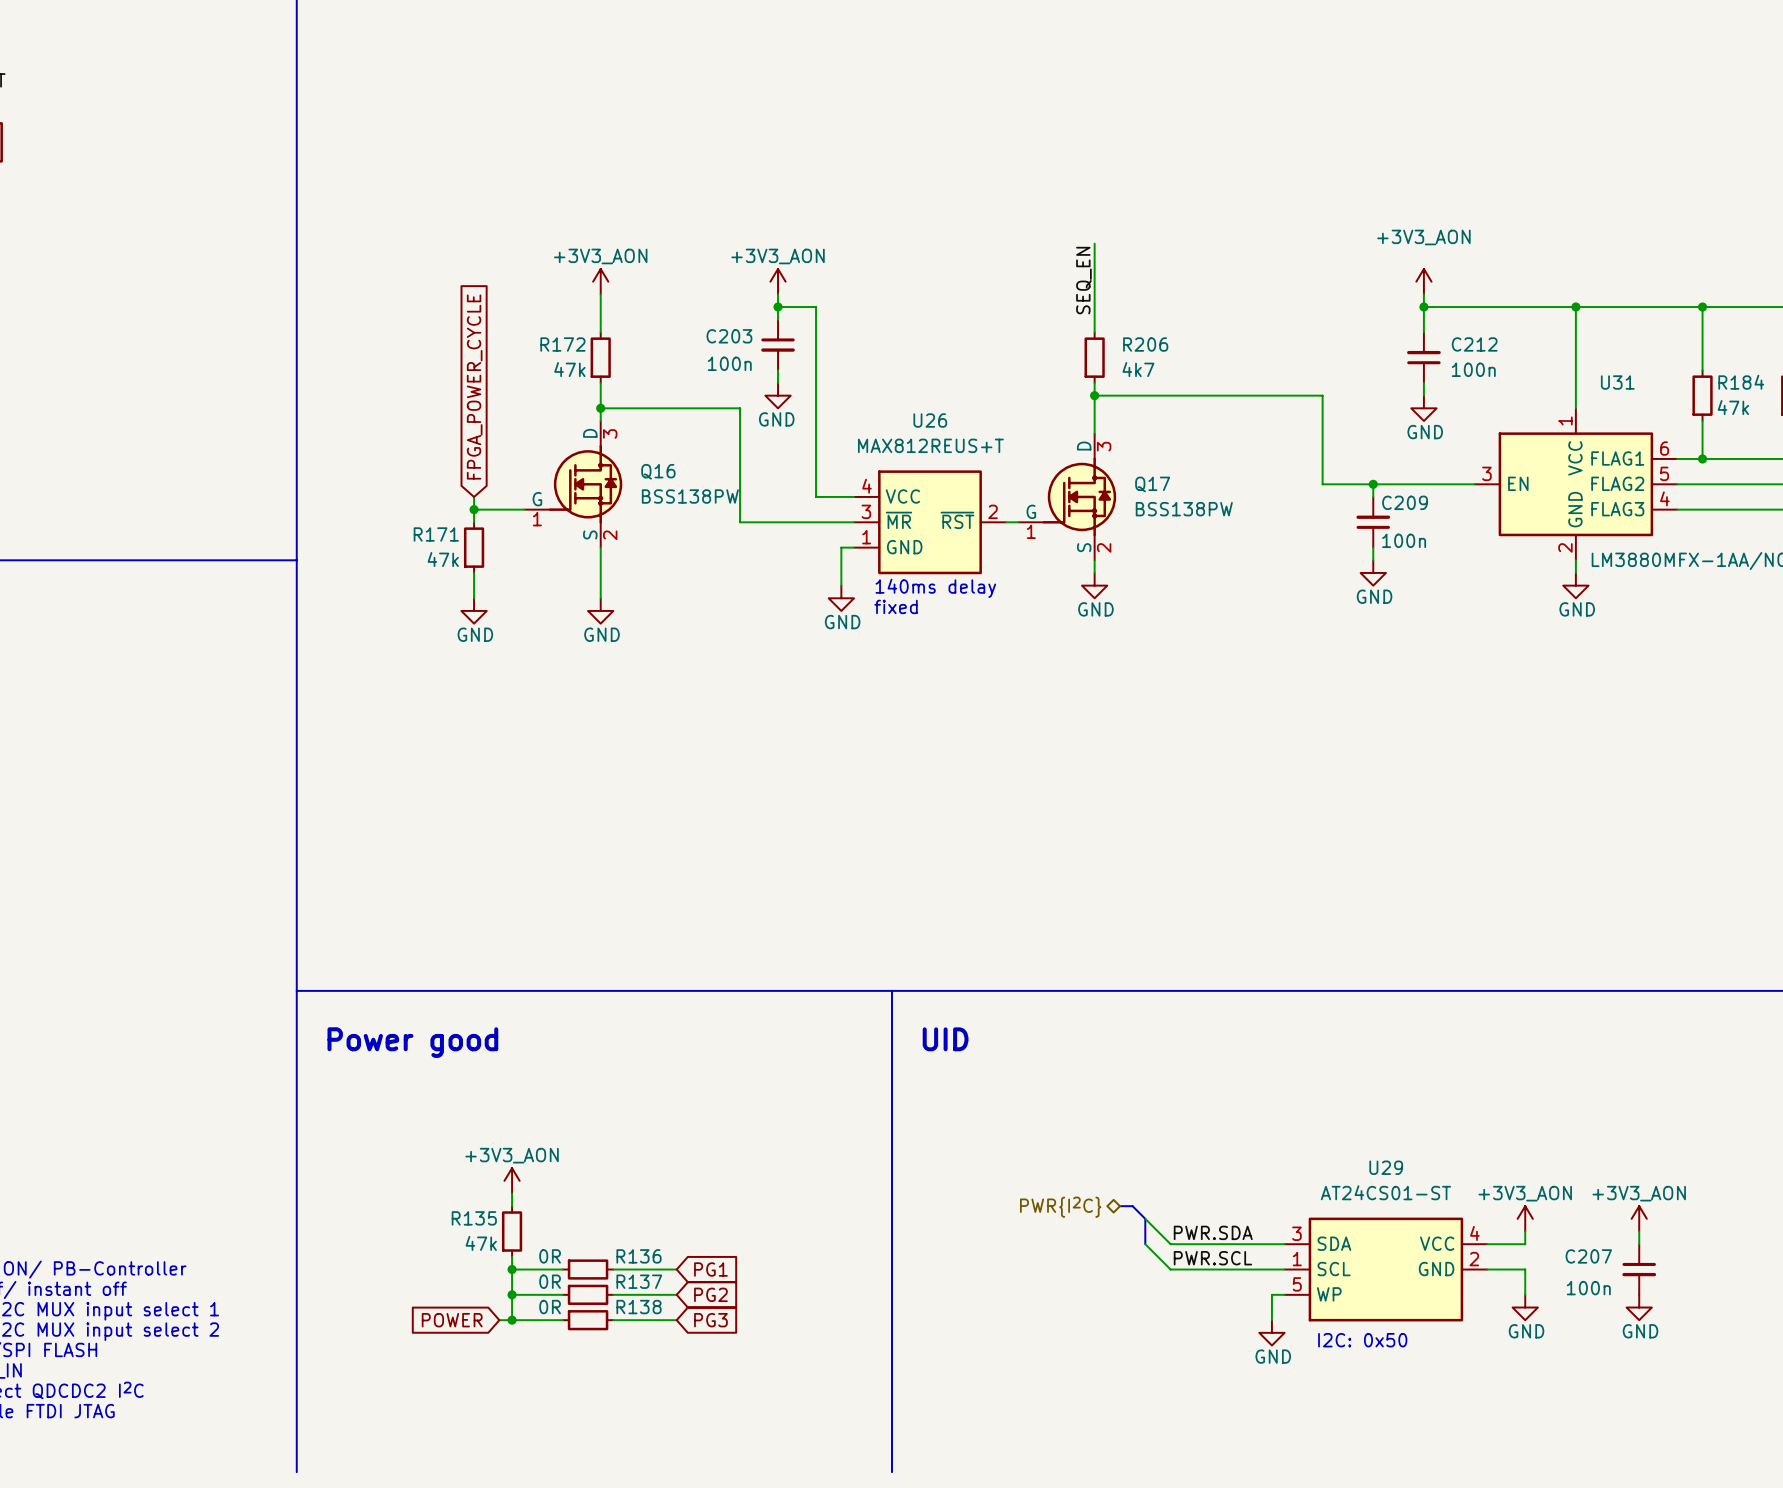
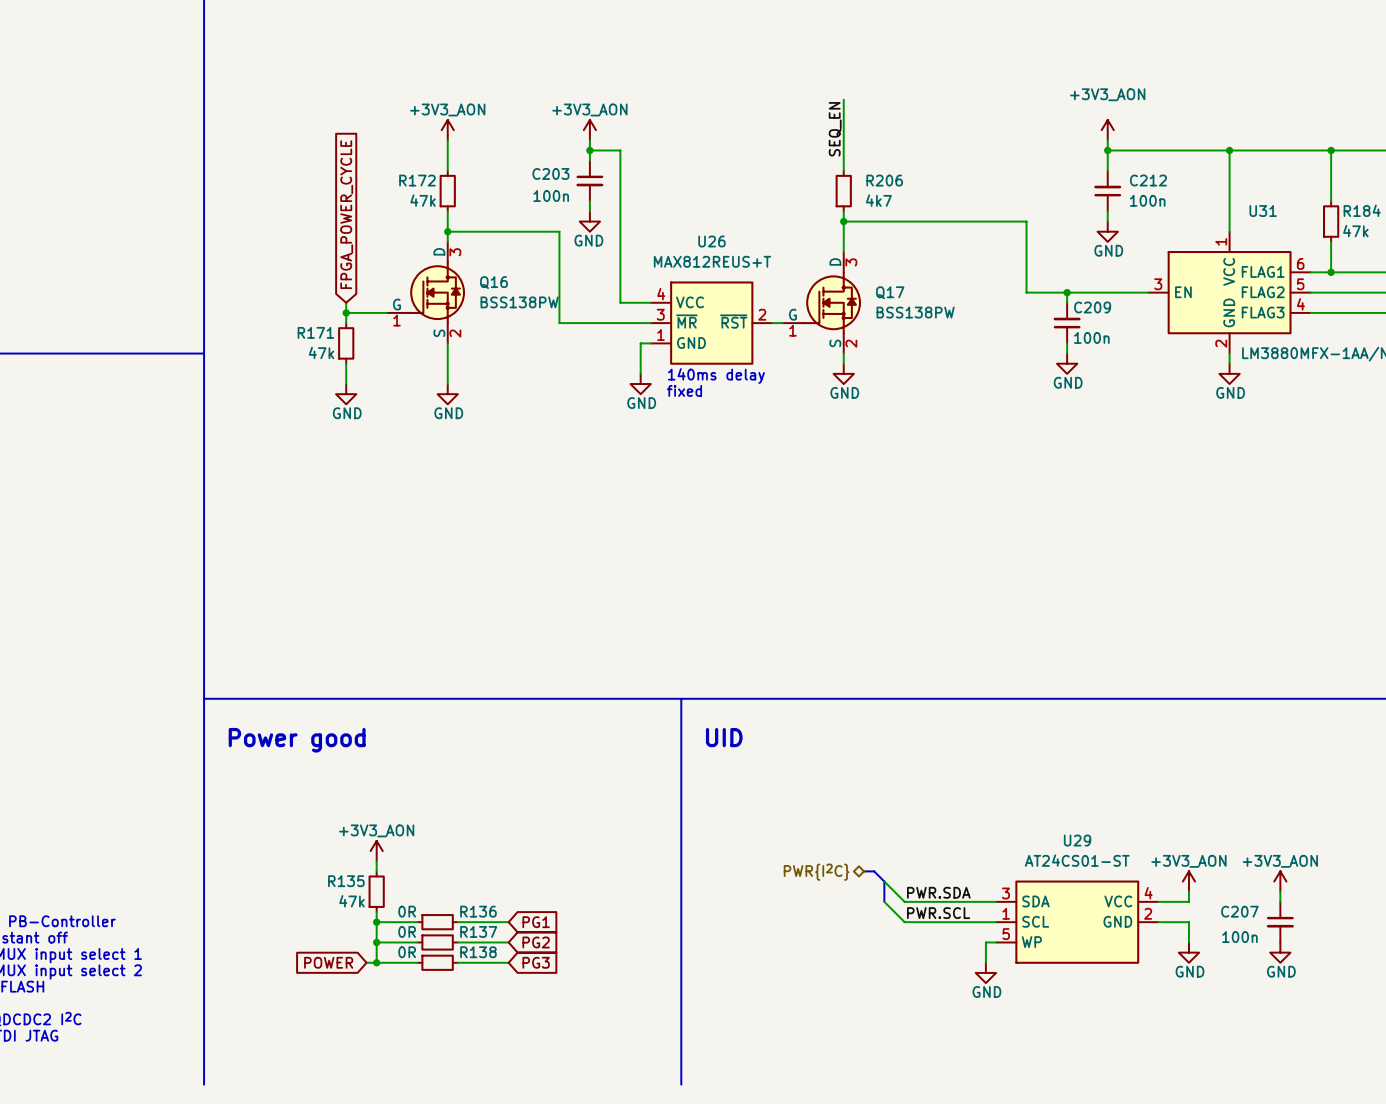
text: I2C: 0x50 (1362, 1340) -> none

